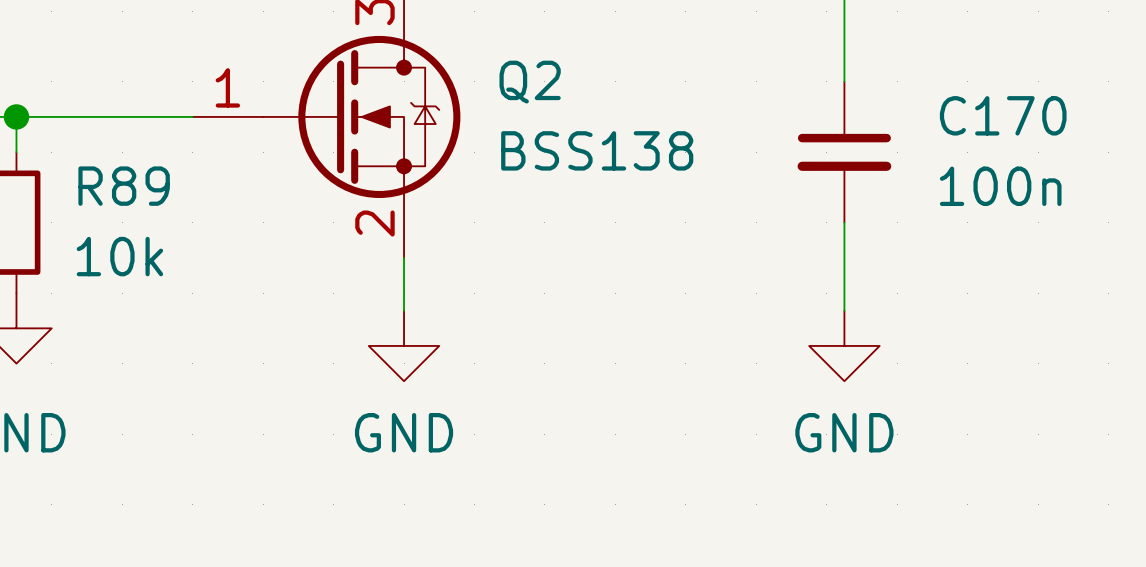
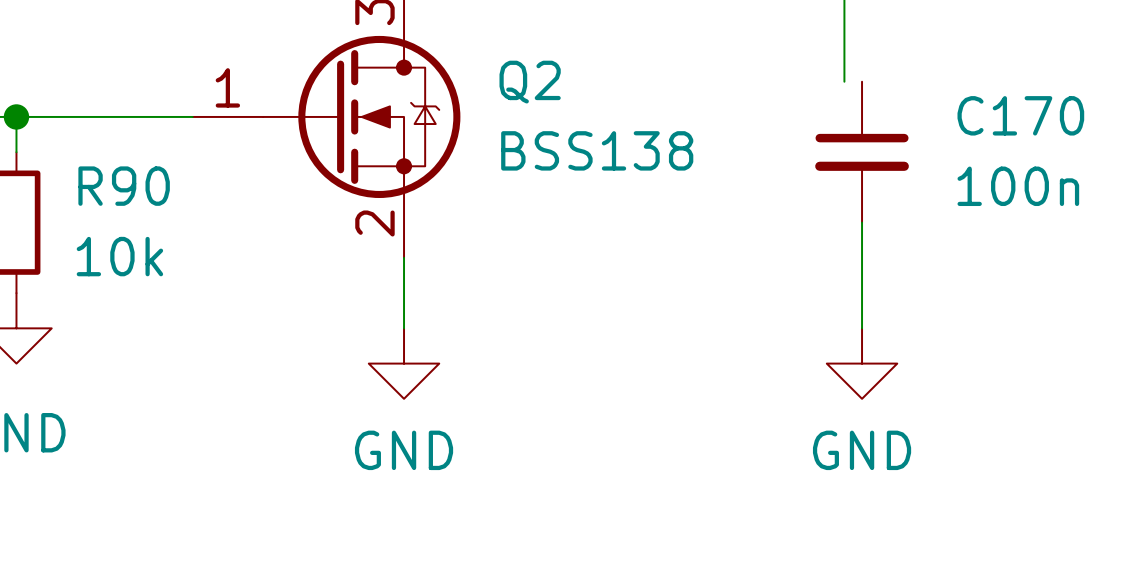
C170 position: (844, 152) -> (862, 152)
R89 name: R89 (124, 186) -> R90 (124, 186)
wire: (844, 222) (844, 310) -> none
wire: none -> (862, 222) (862, 328)
power symbol position: GND (404, 345) -> GND (404, 363)
power symbol position: GND (844, 345) -> GND (862, 363)

